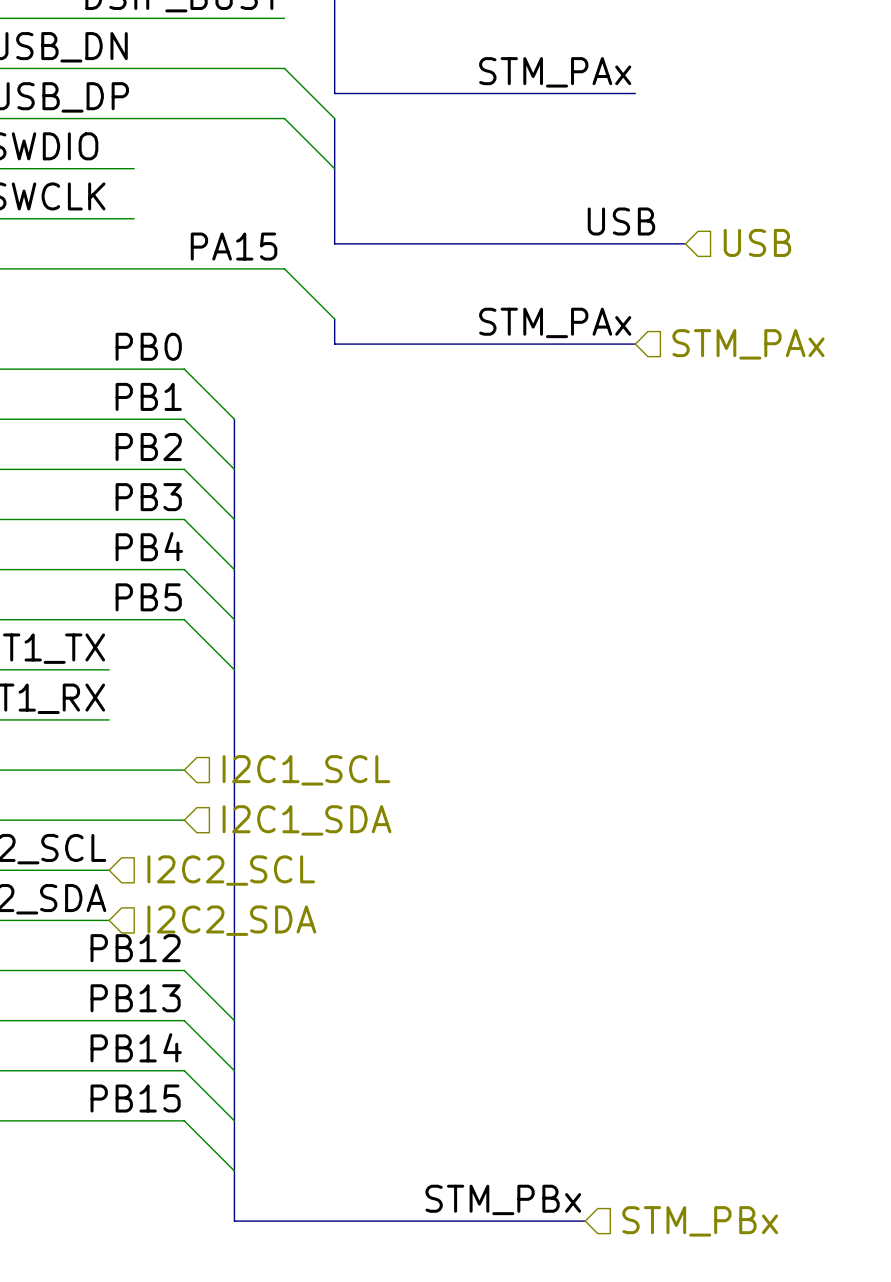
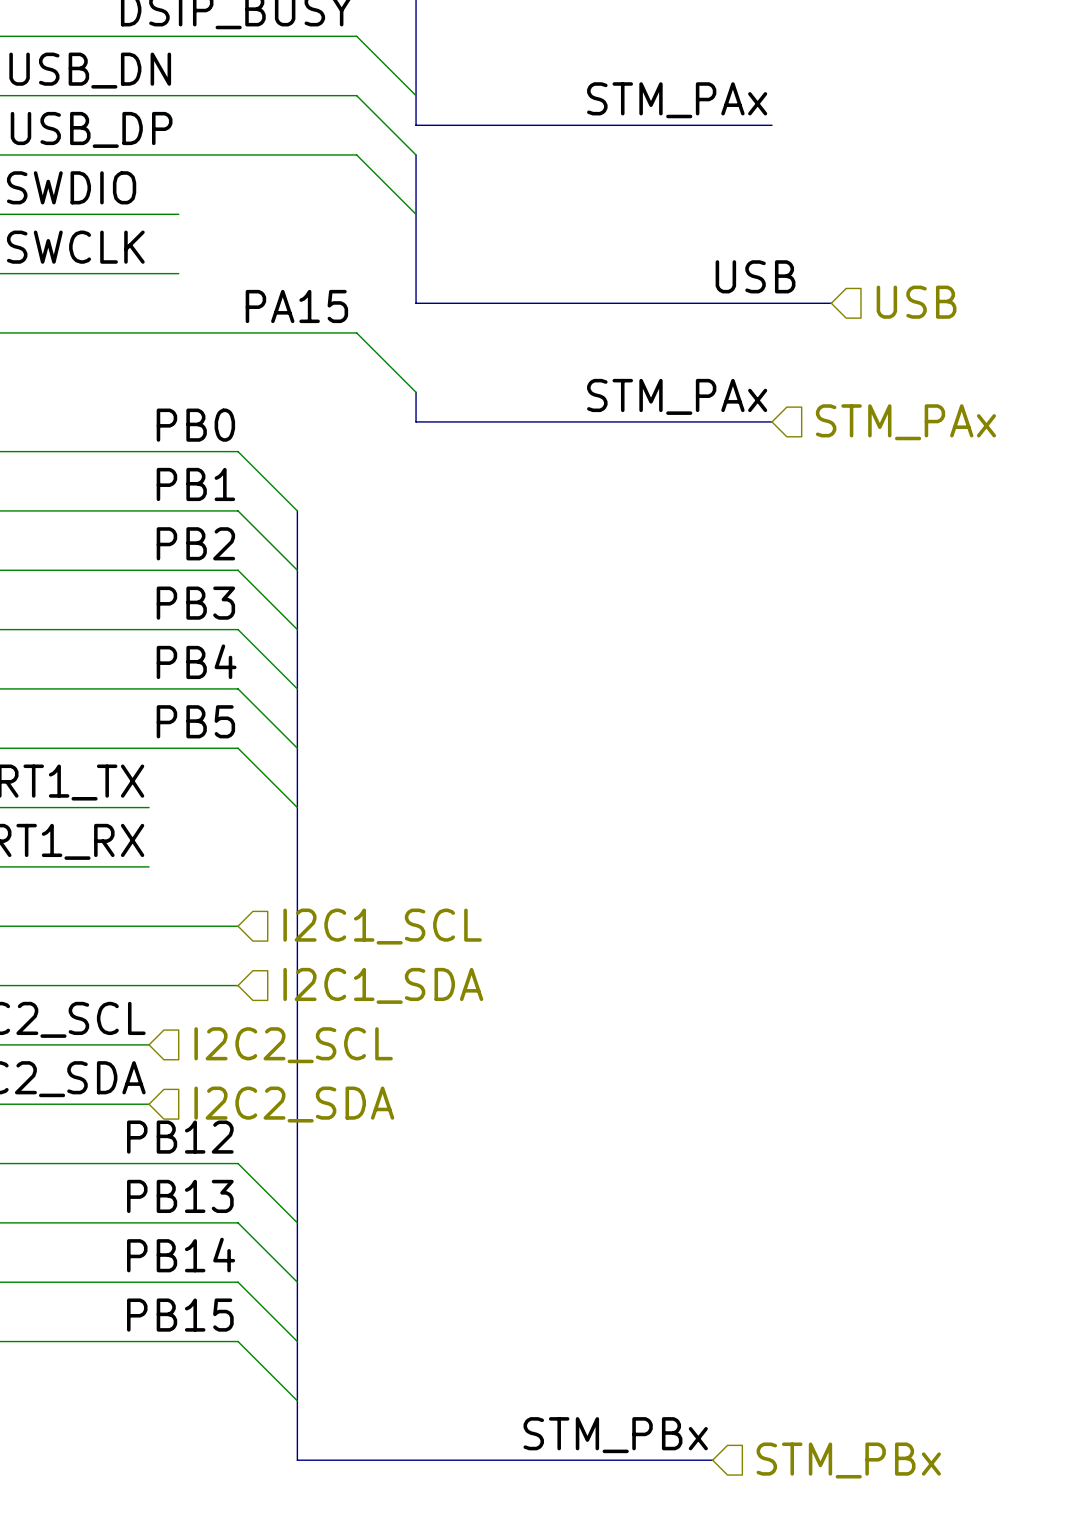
wire: none -> (356, 36) (416, 95)

